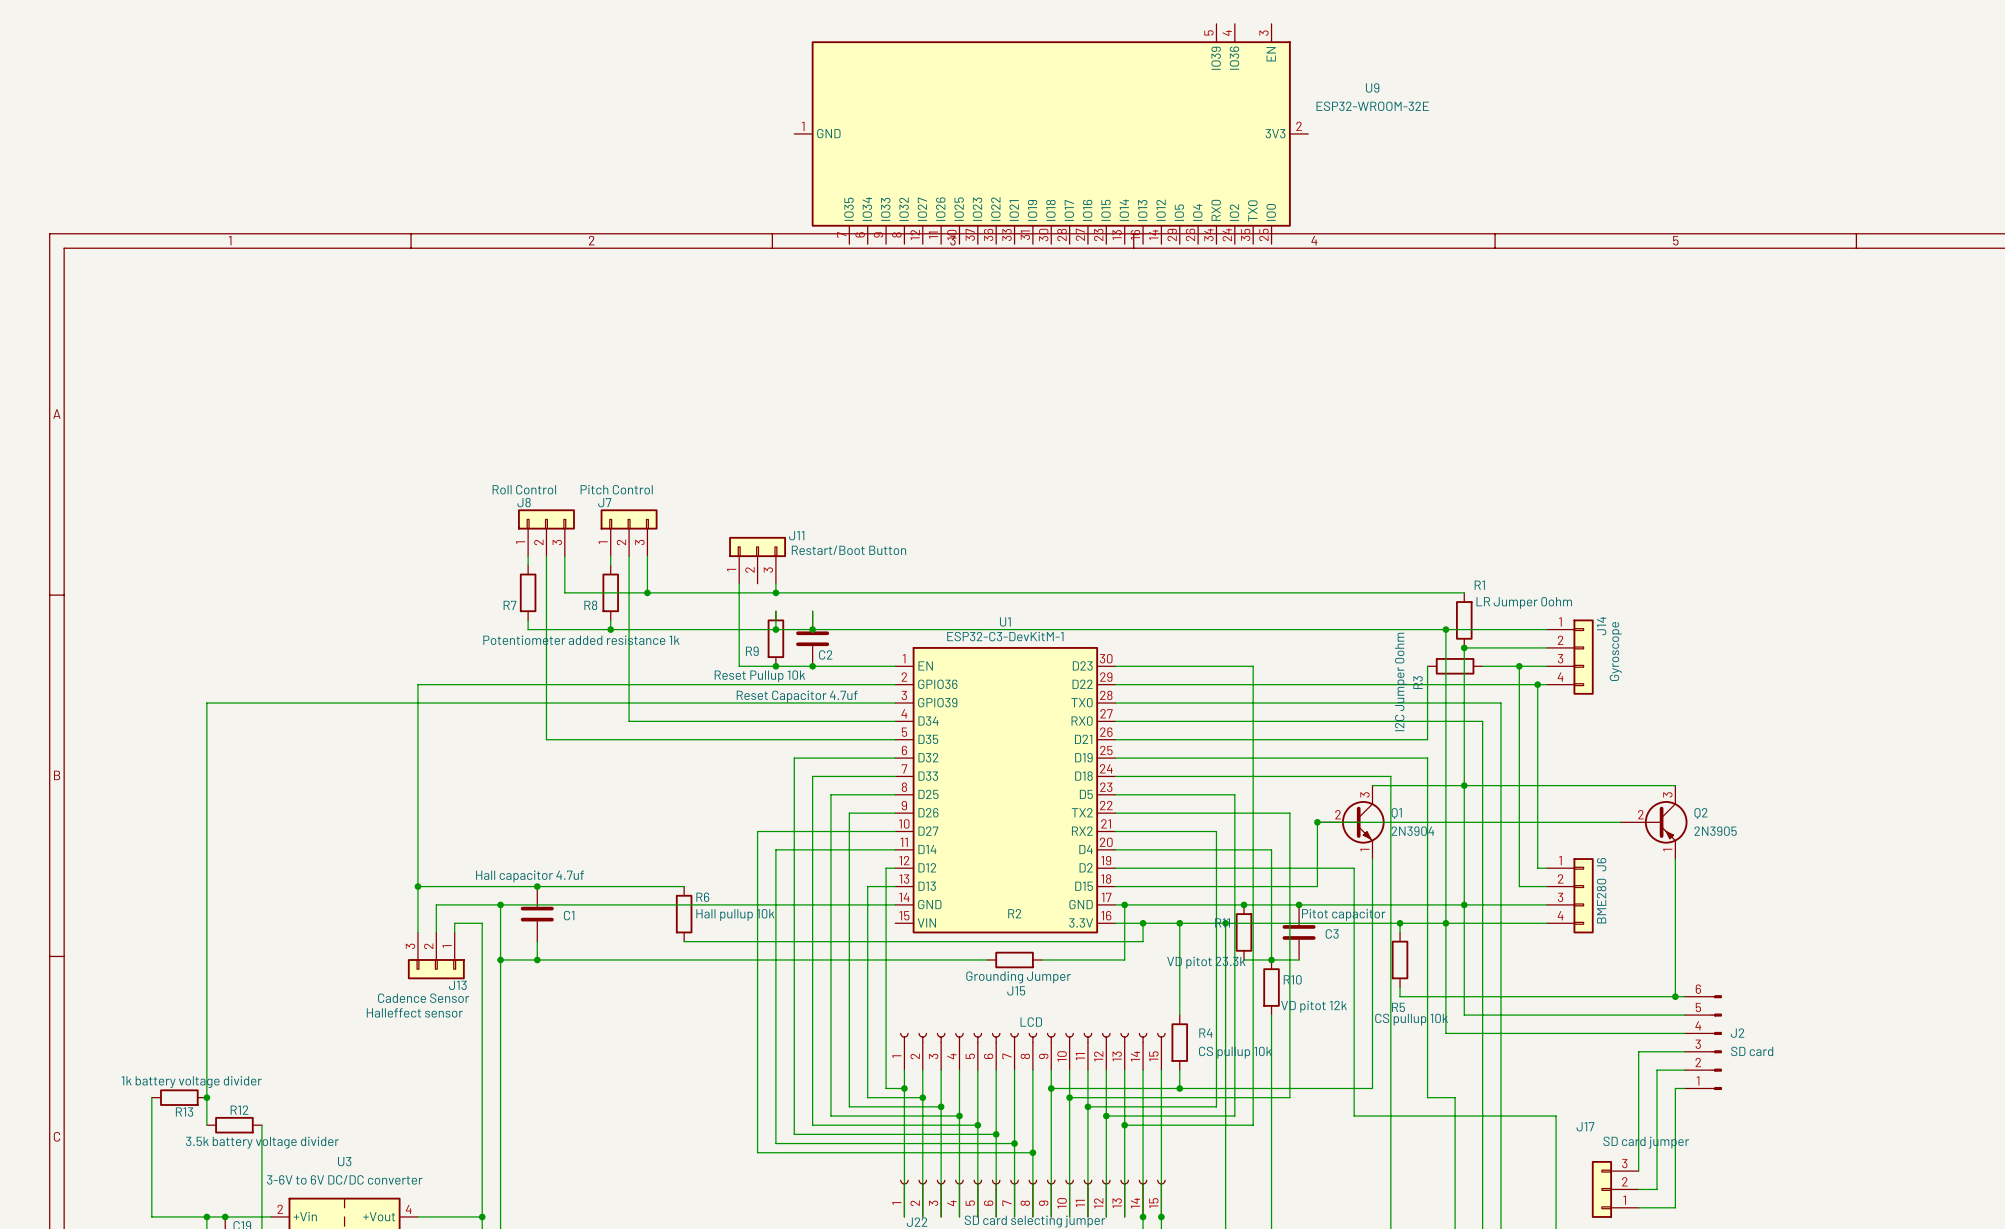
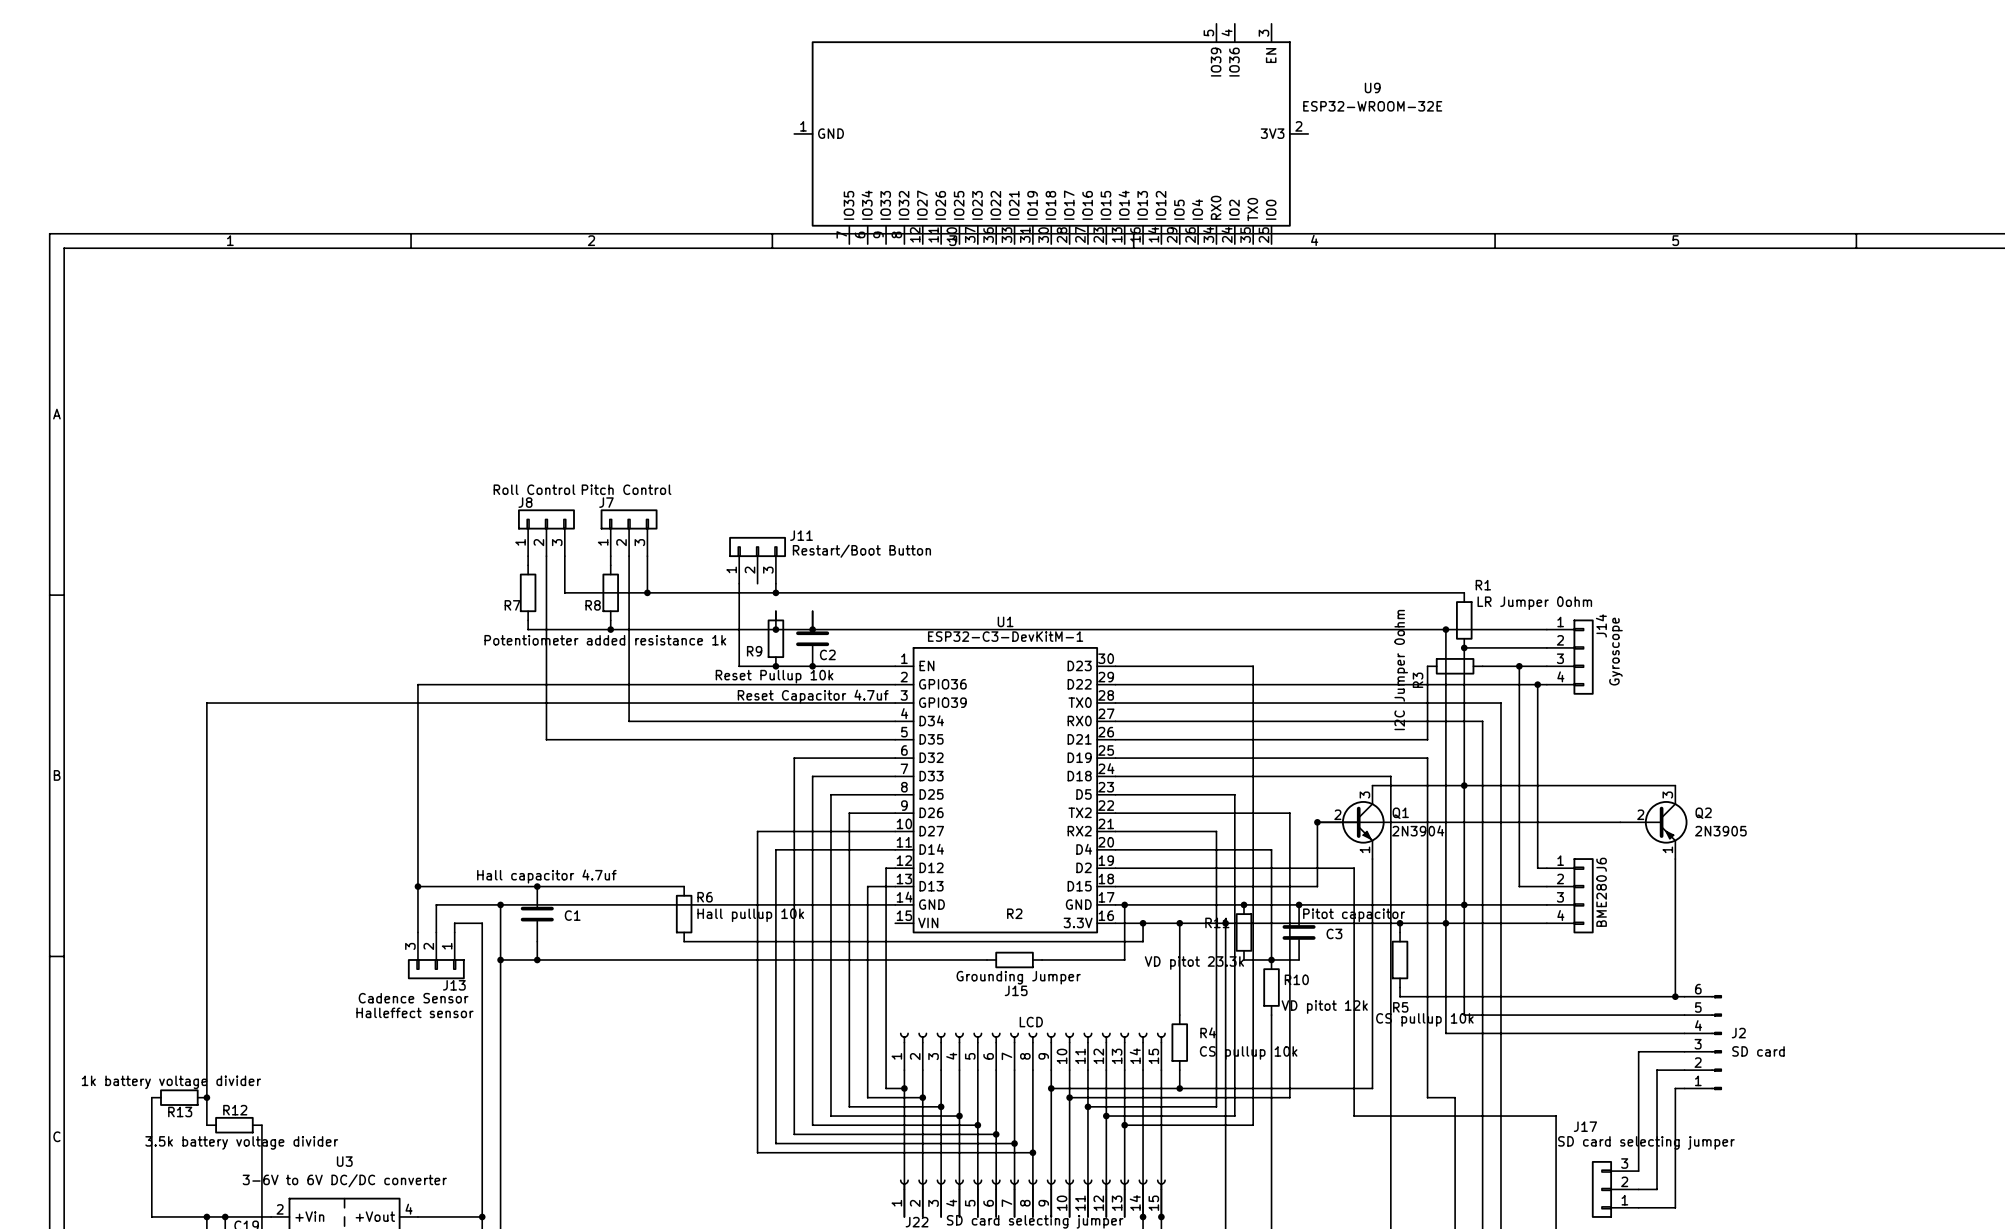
J17 value: SD card jumper (1646, 1142) -> SD card selecting jumper (1646, 1142)

